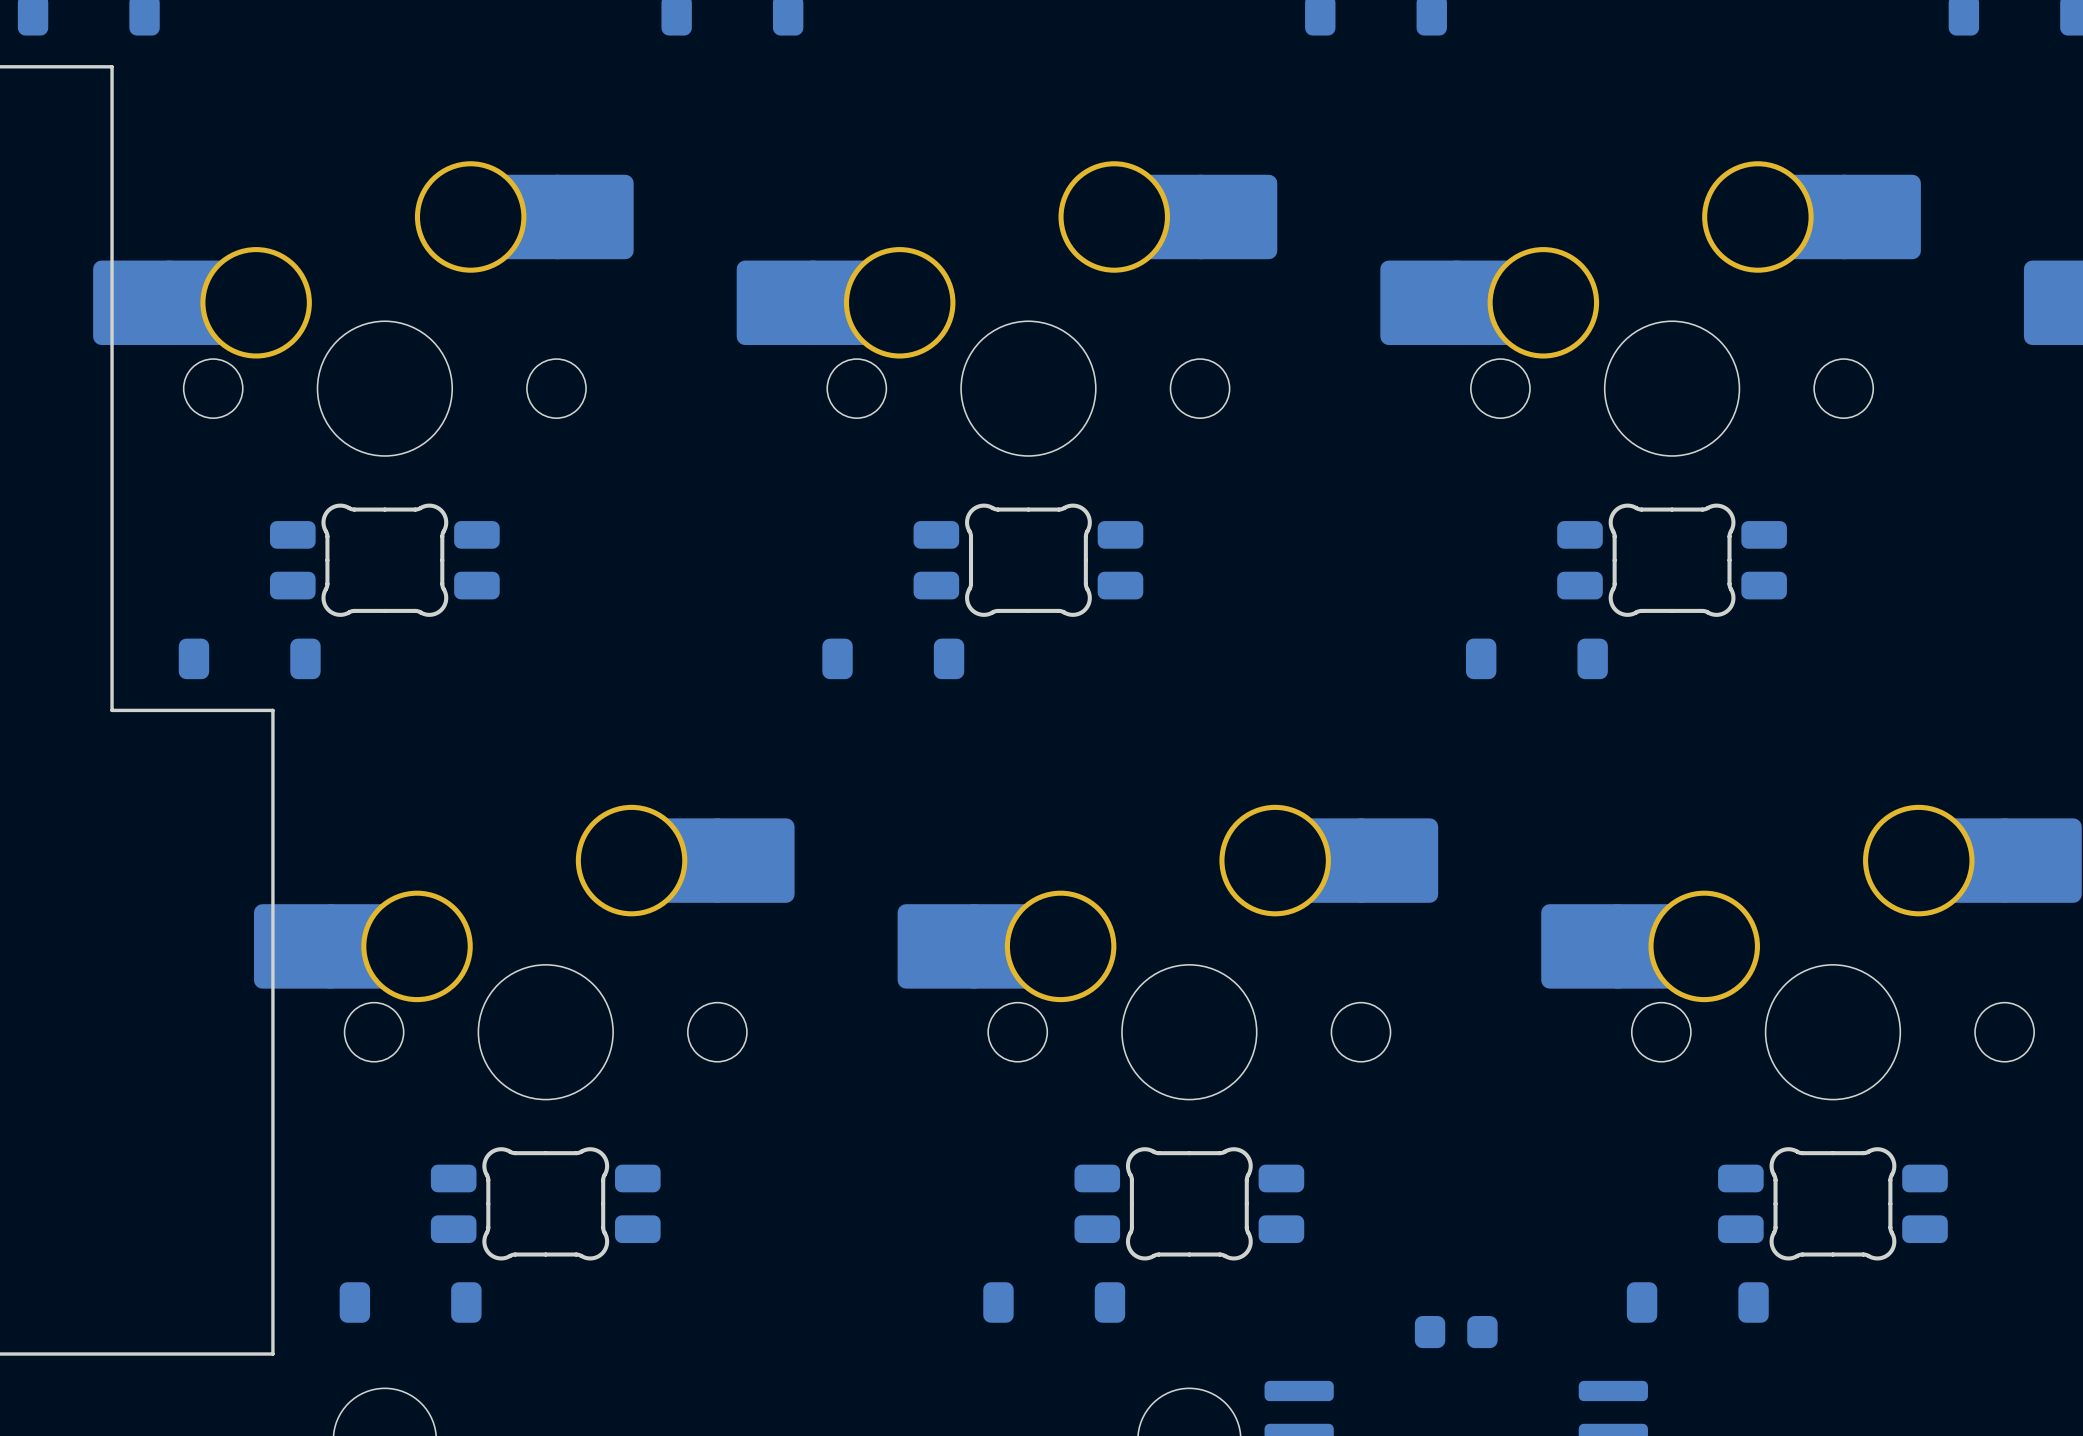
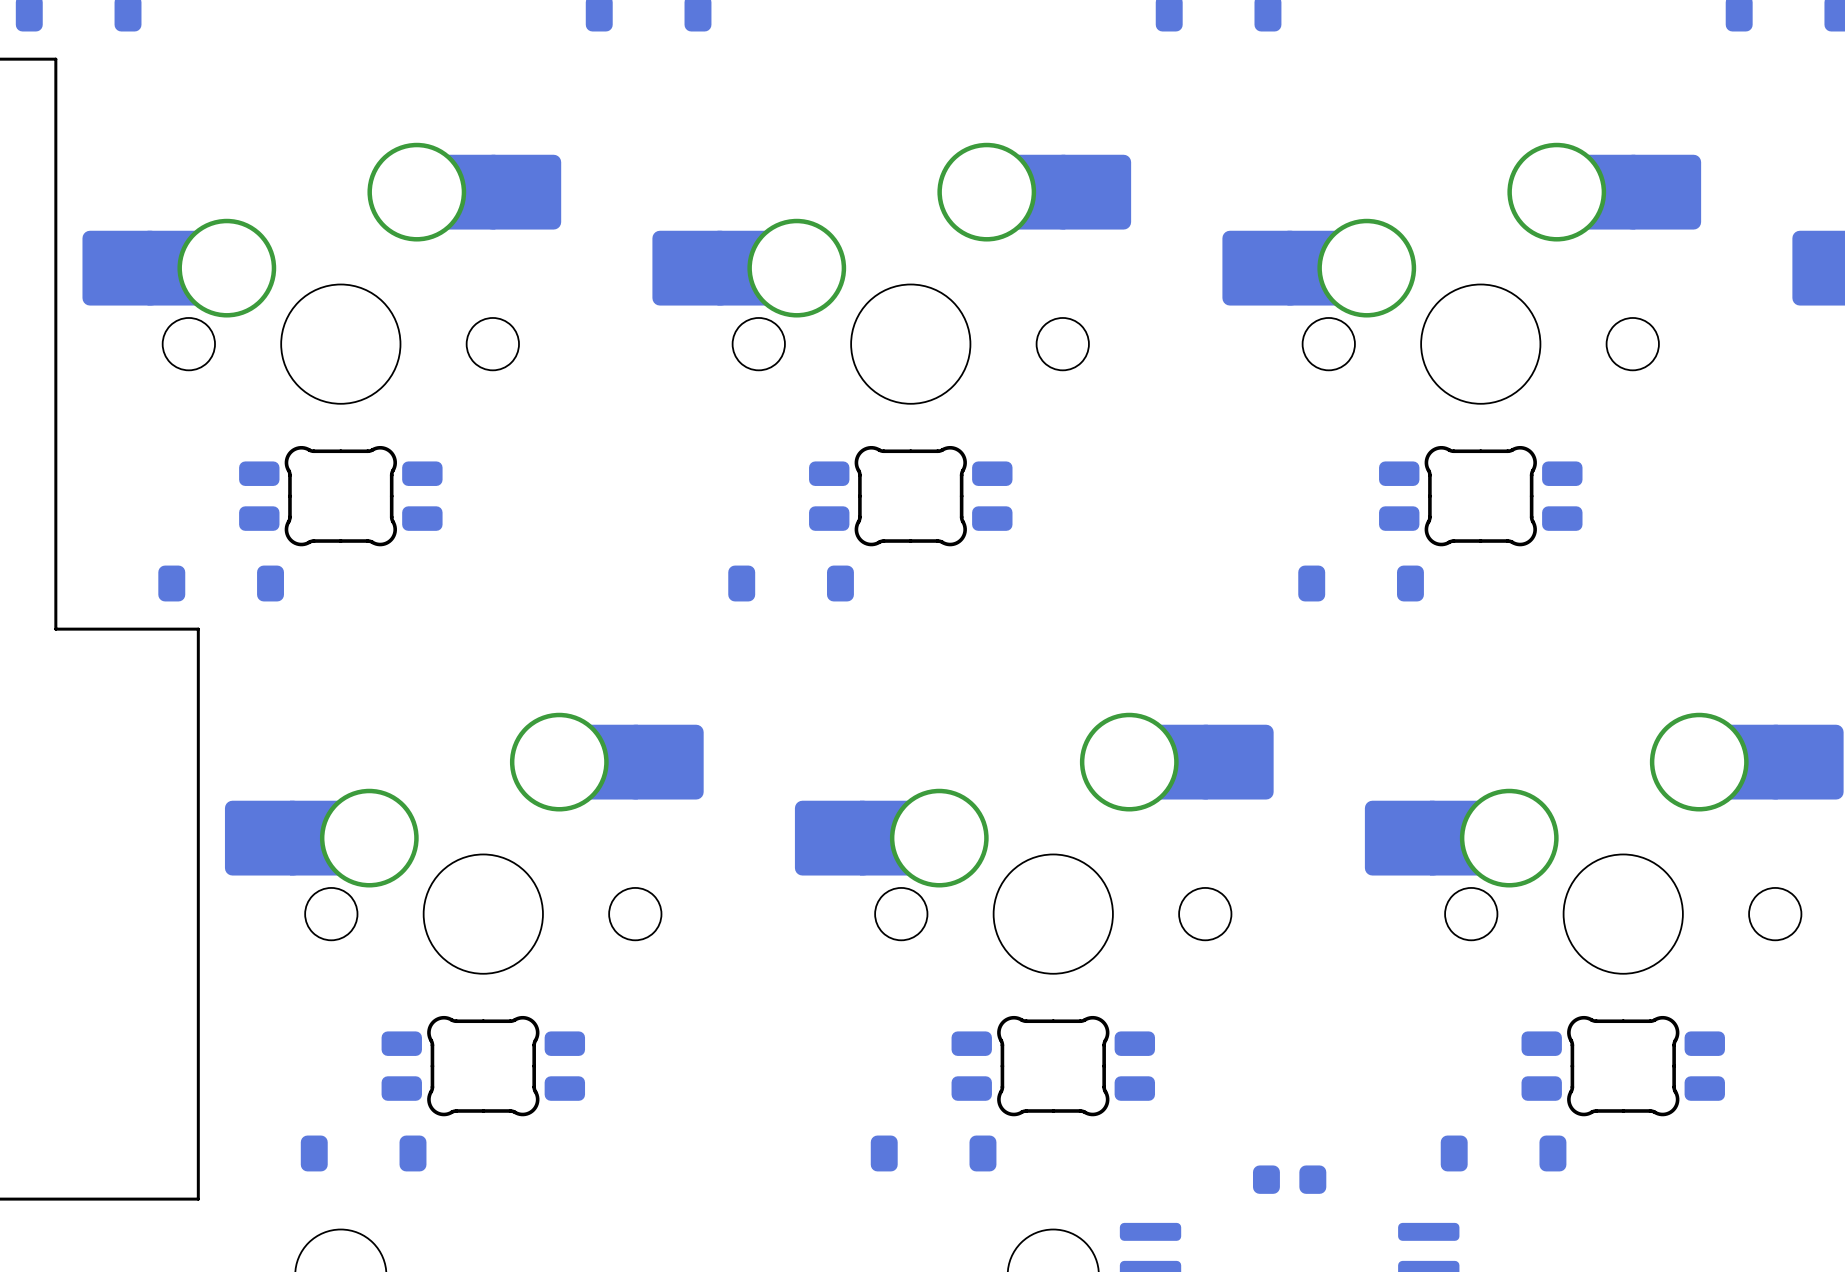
board edge: (63, 66) (112, 66) (112, 710) -> (55, 59) (55, 629) (99, 629)
board edge: (223, 710) (272, 710) (272, 1354) (223, 1354) -> (198, 629) (198, 1199)

